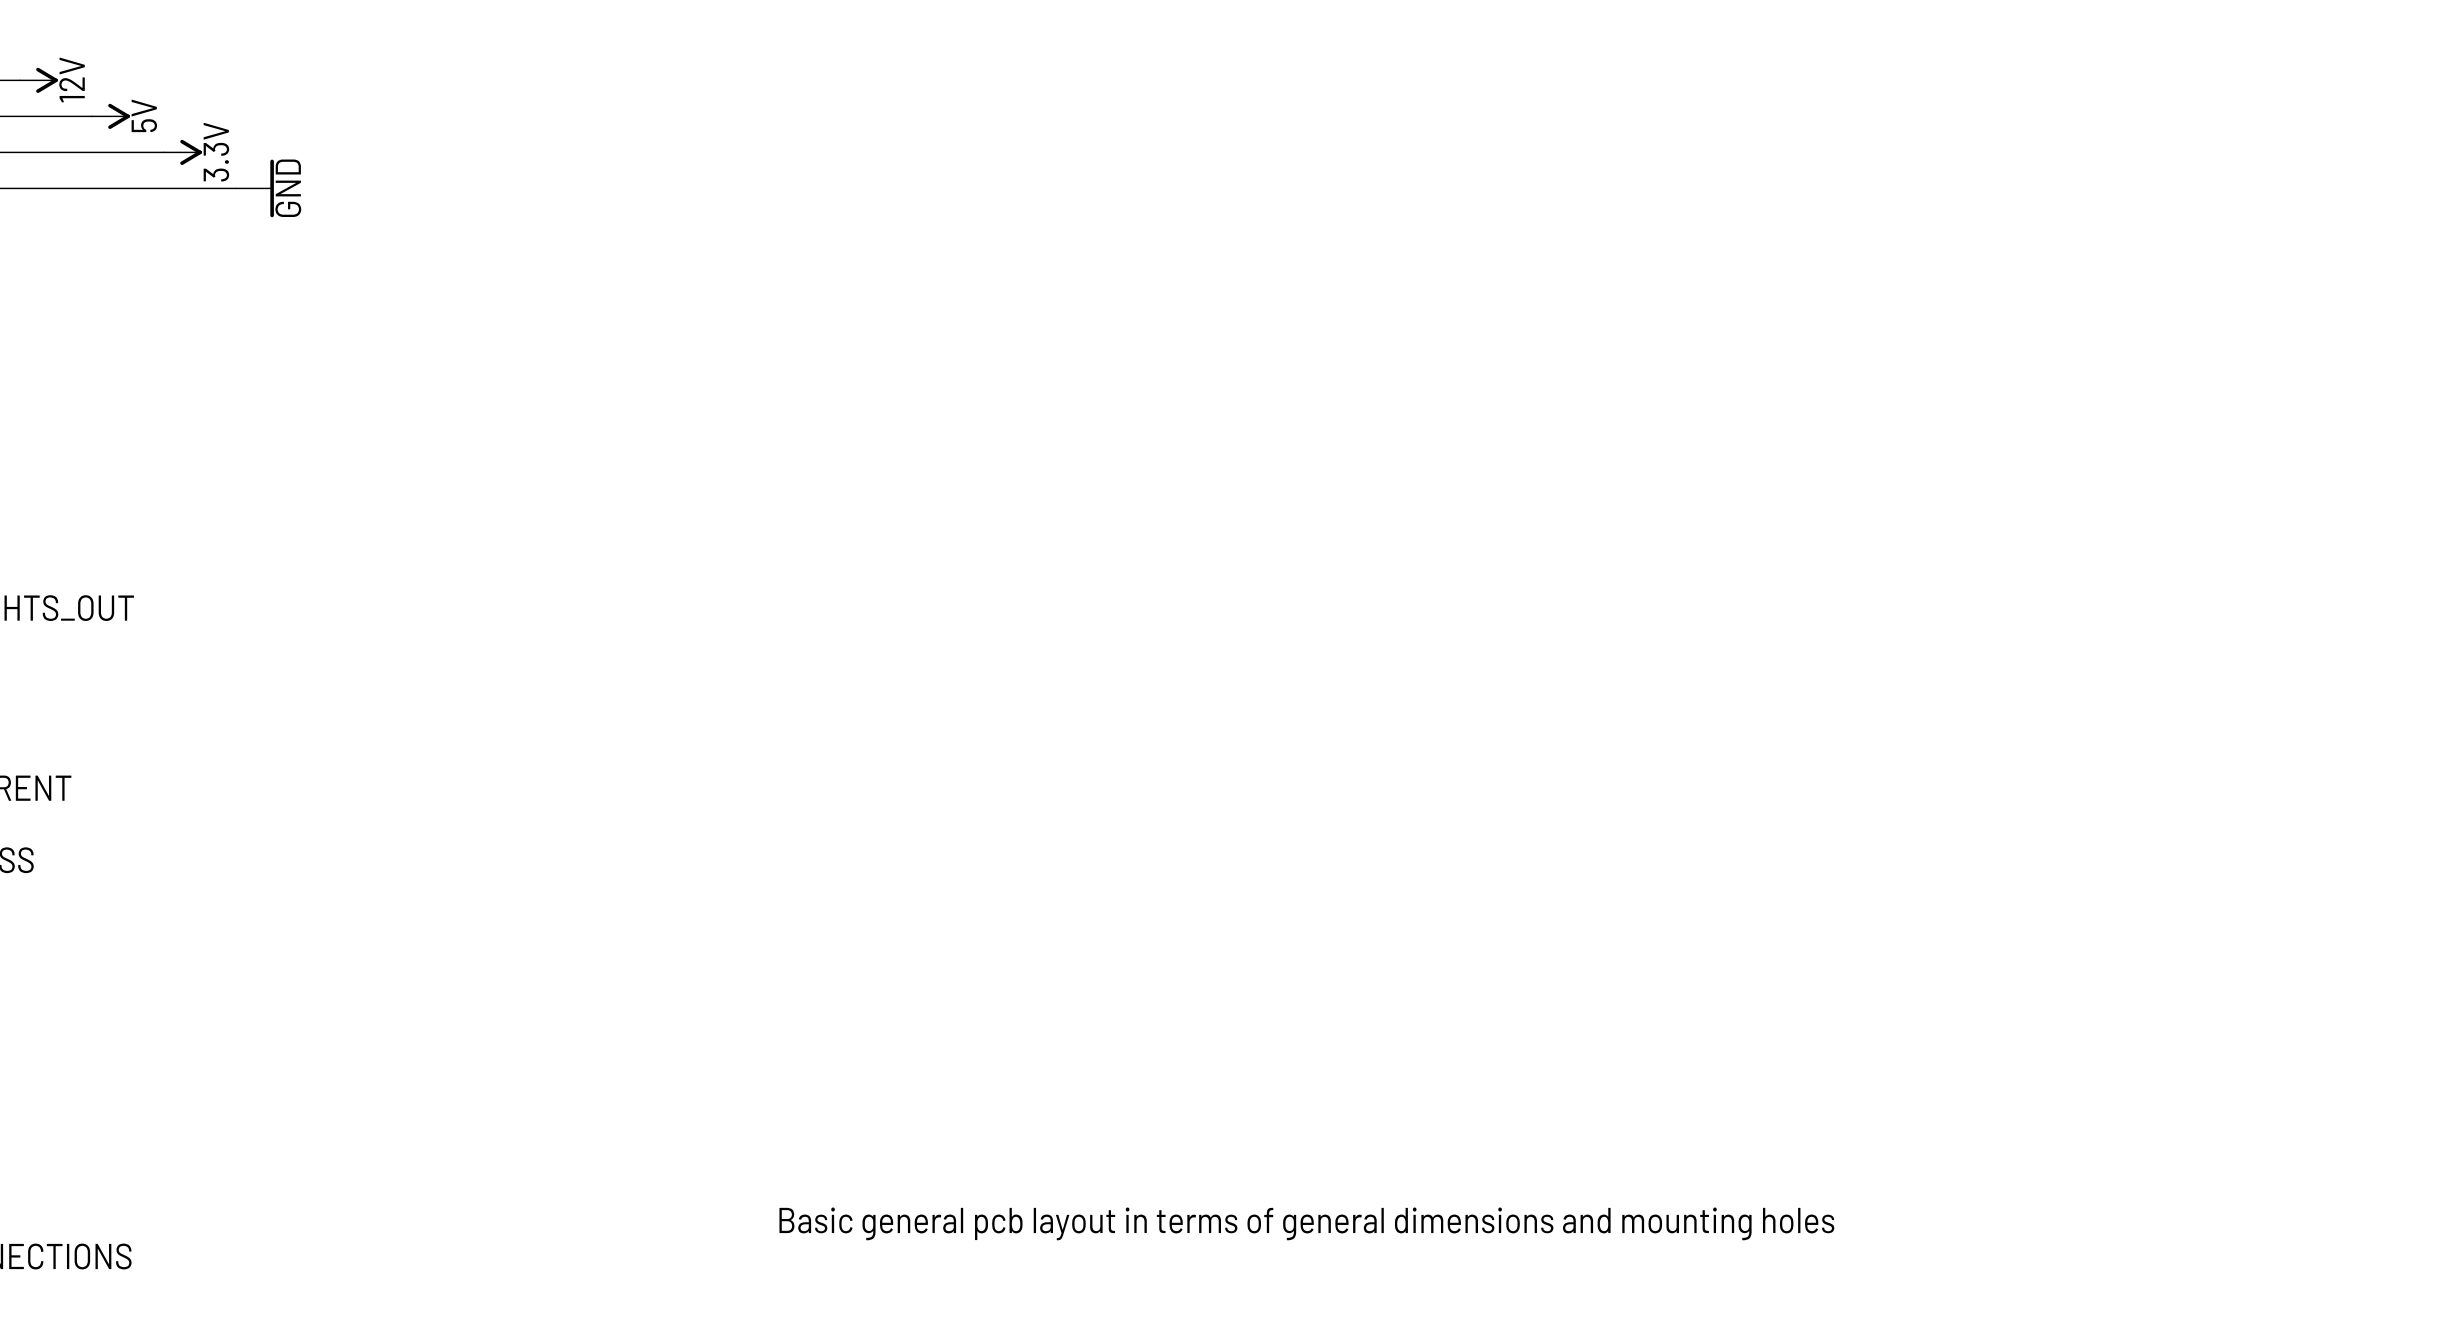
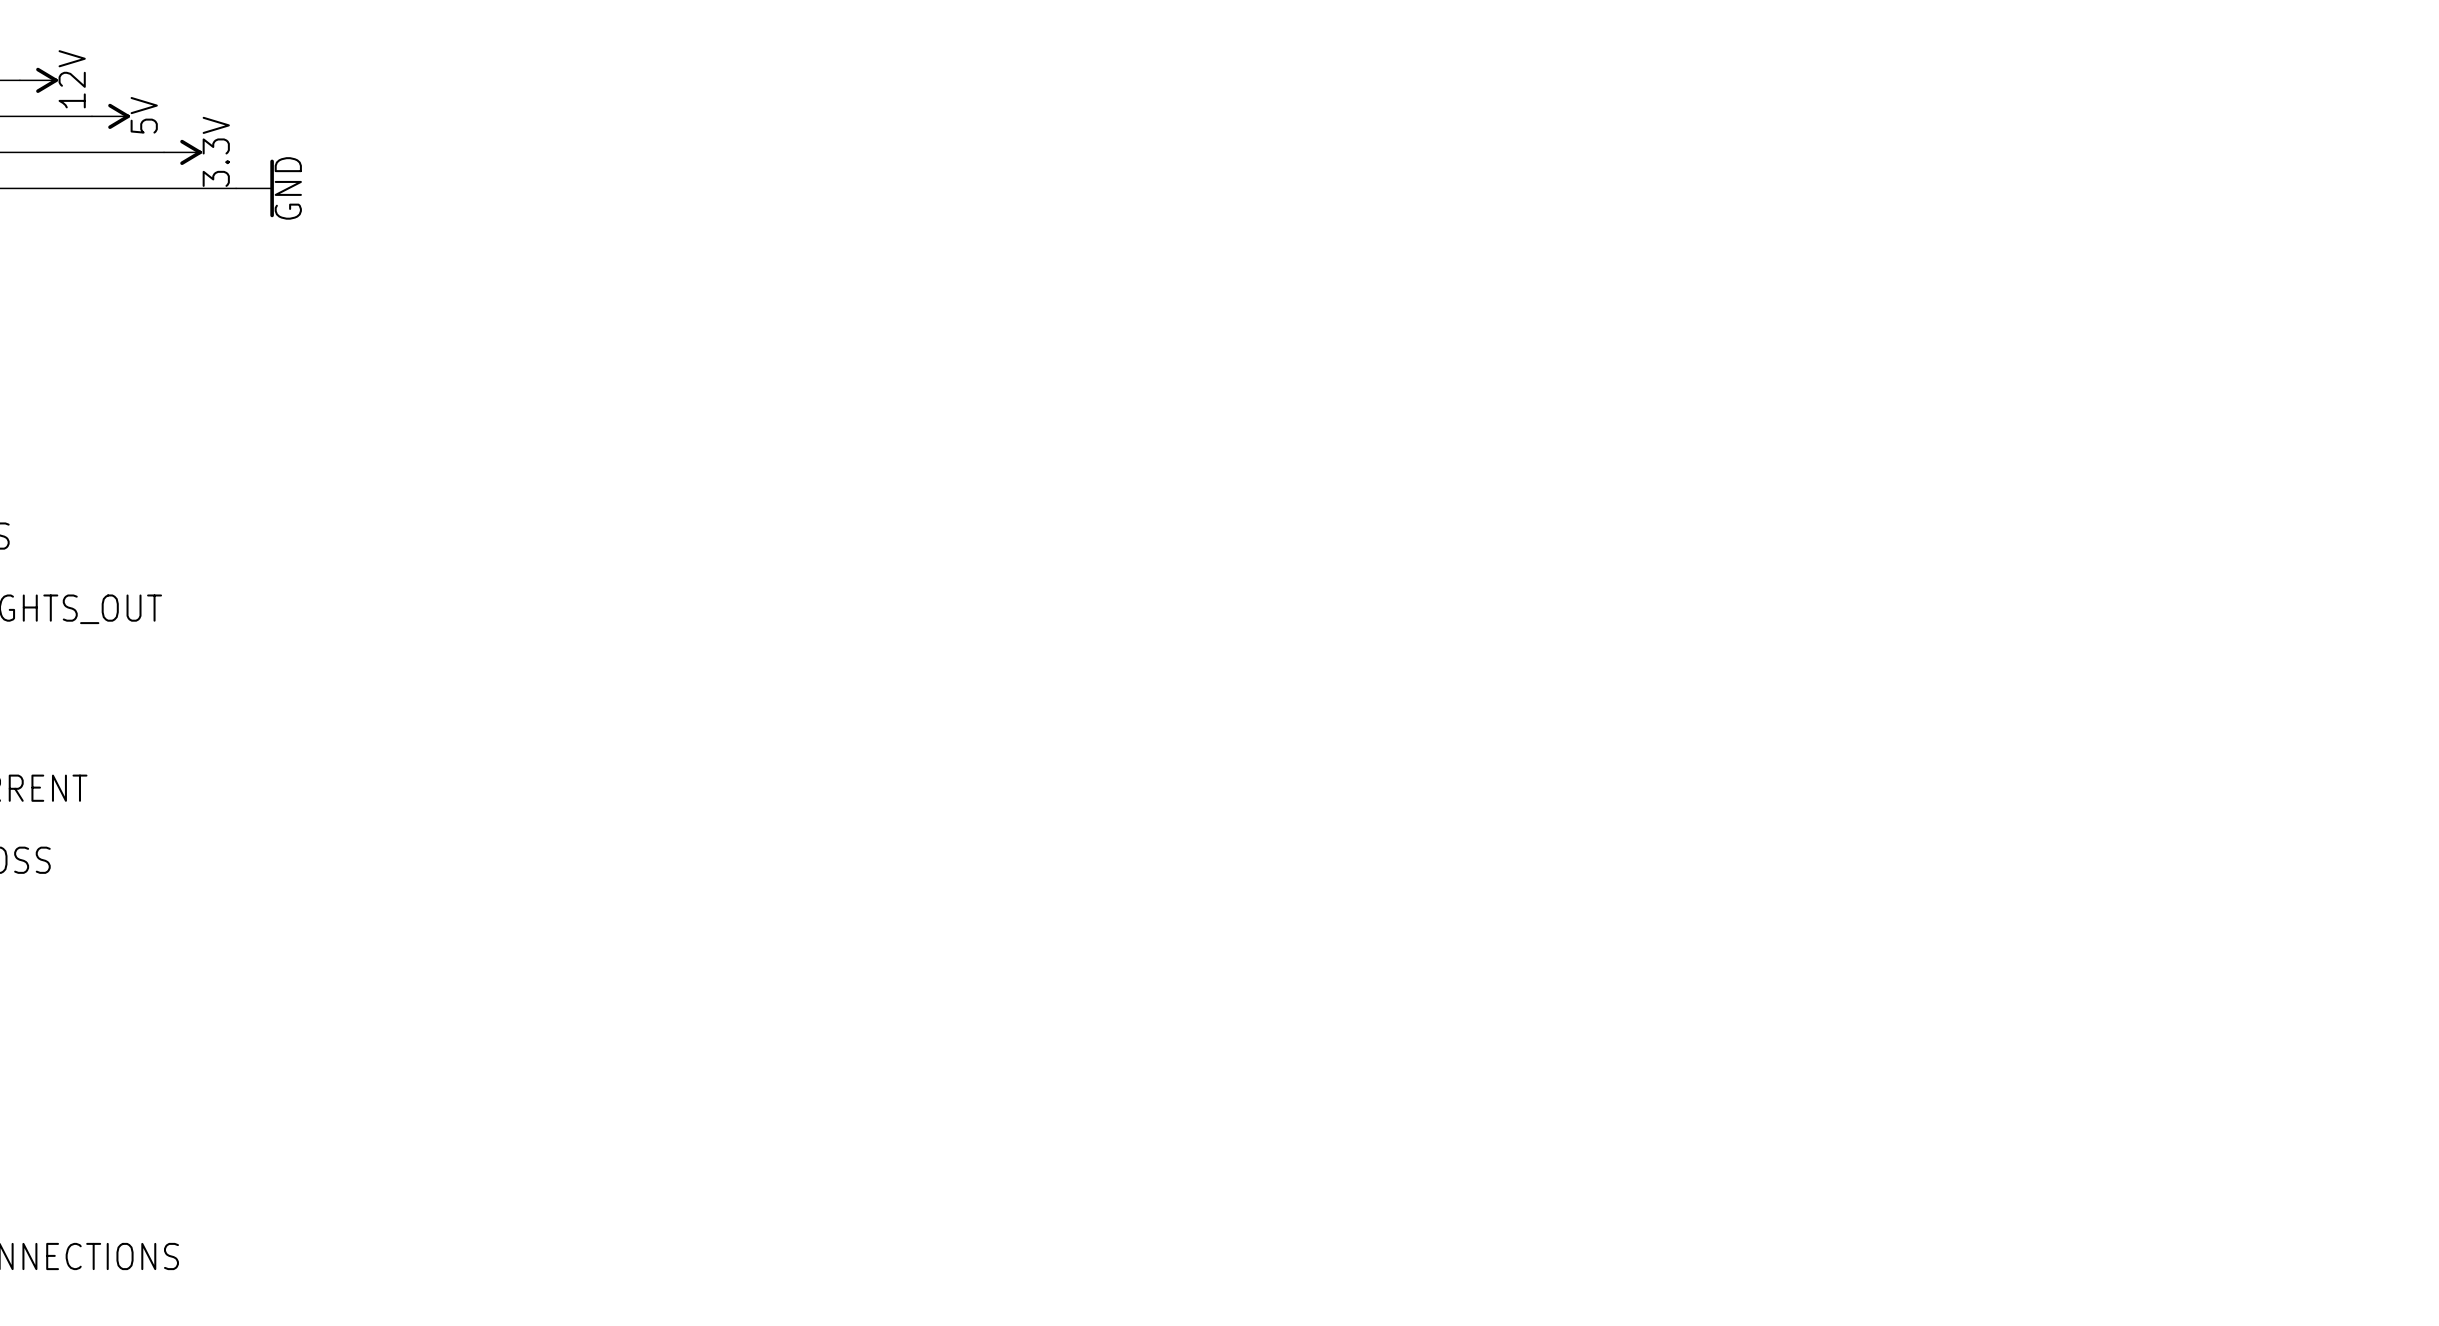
text: Basic general pcb layout in terms of general dimensions and mounting holes (1306, 1223) -> none

